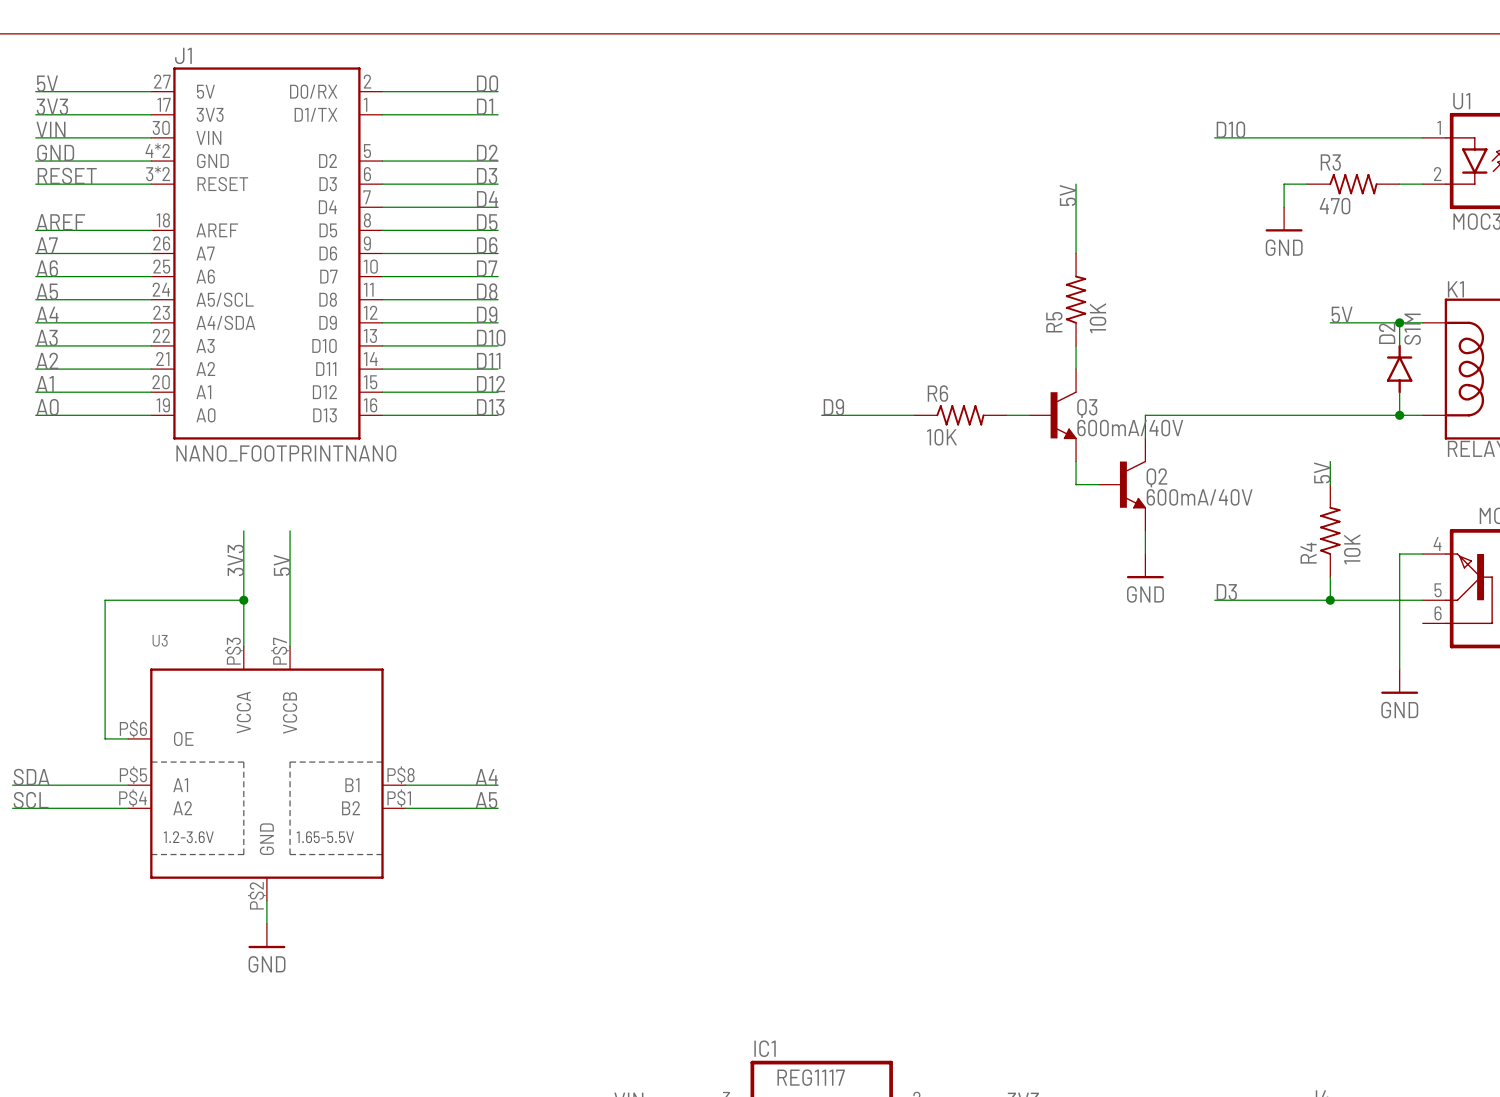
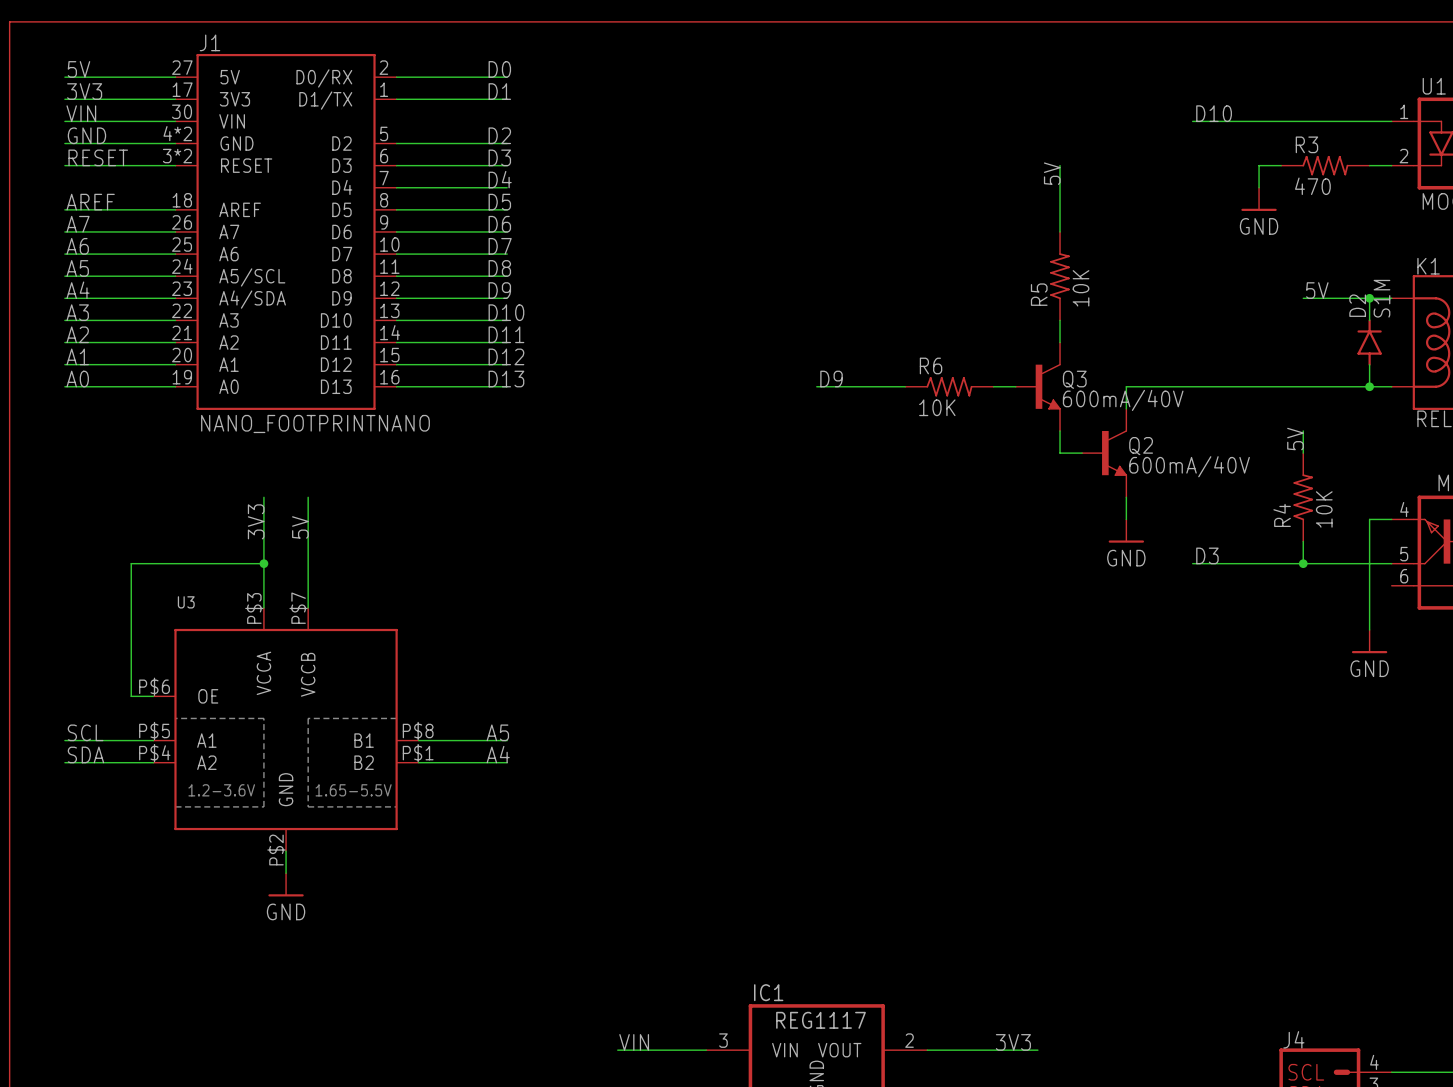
label position: SDA (31, 777) -> SDA (85, 754)
label: A4 (486, 777) -> A5 (497, 732)
wire: (12, 785) (35, 785) -> none
label position: SCL (31, 800) -> SCL (85, 732)
label: A5 (486, 800) -> A4 (498, 754)
wire: (12, 808) (35, 808) -> none

